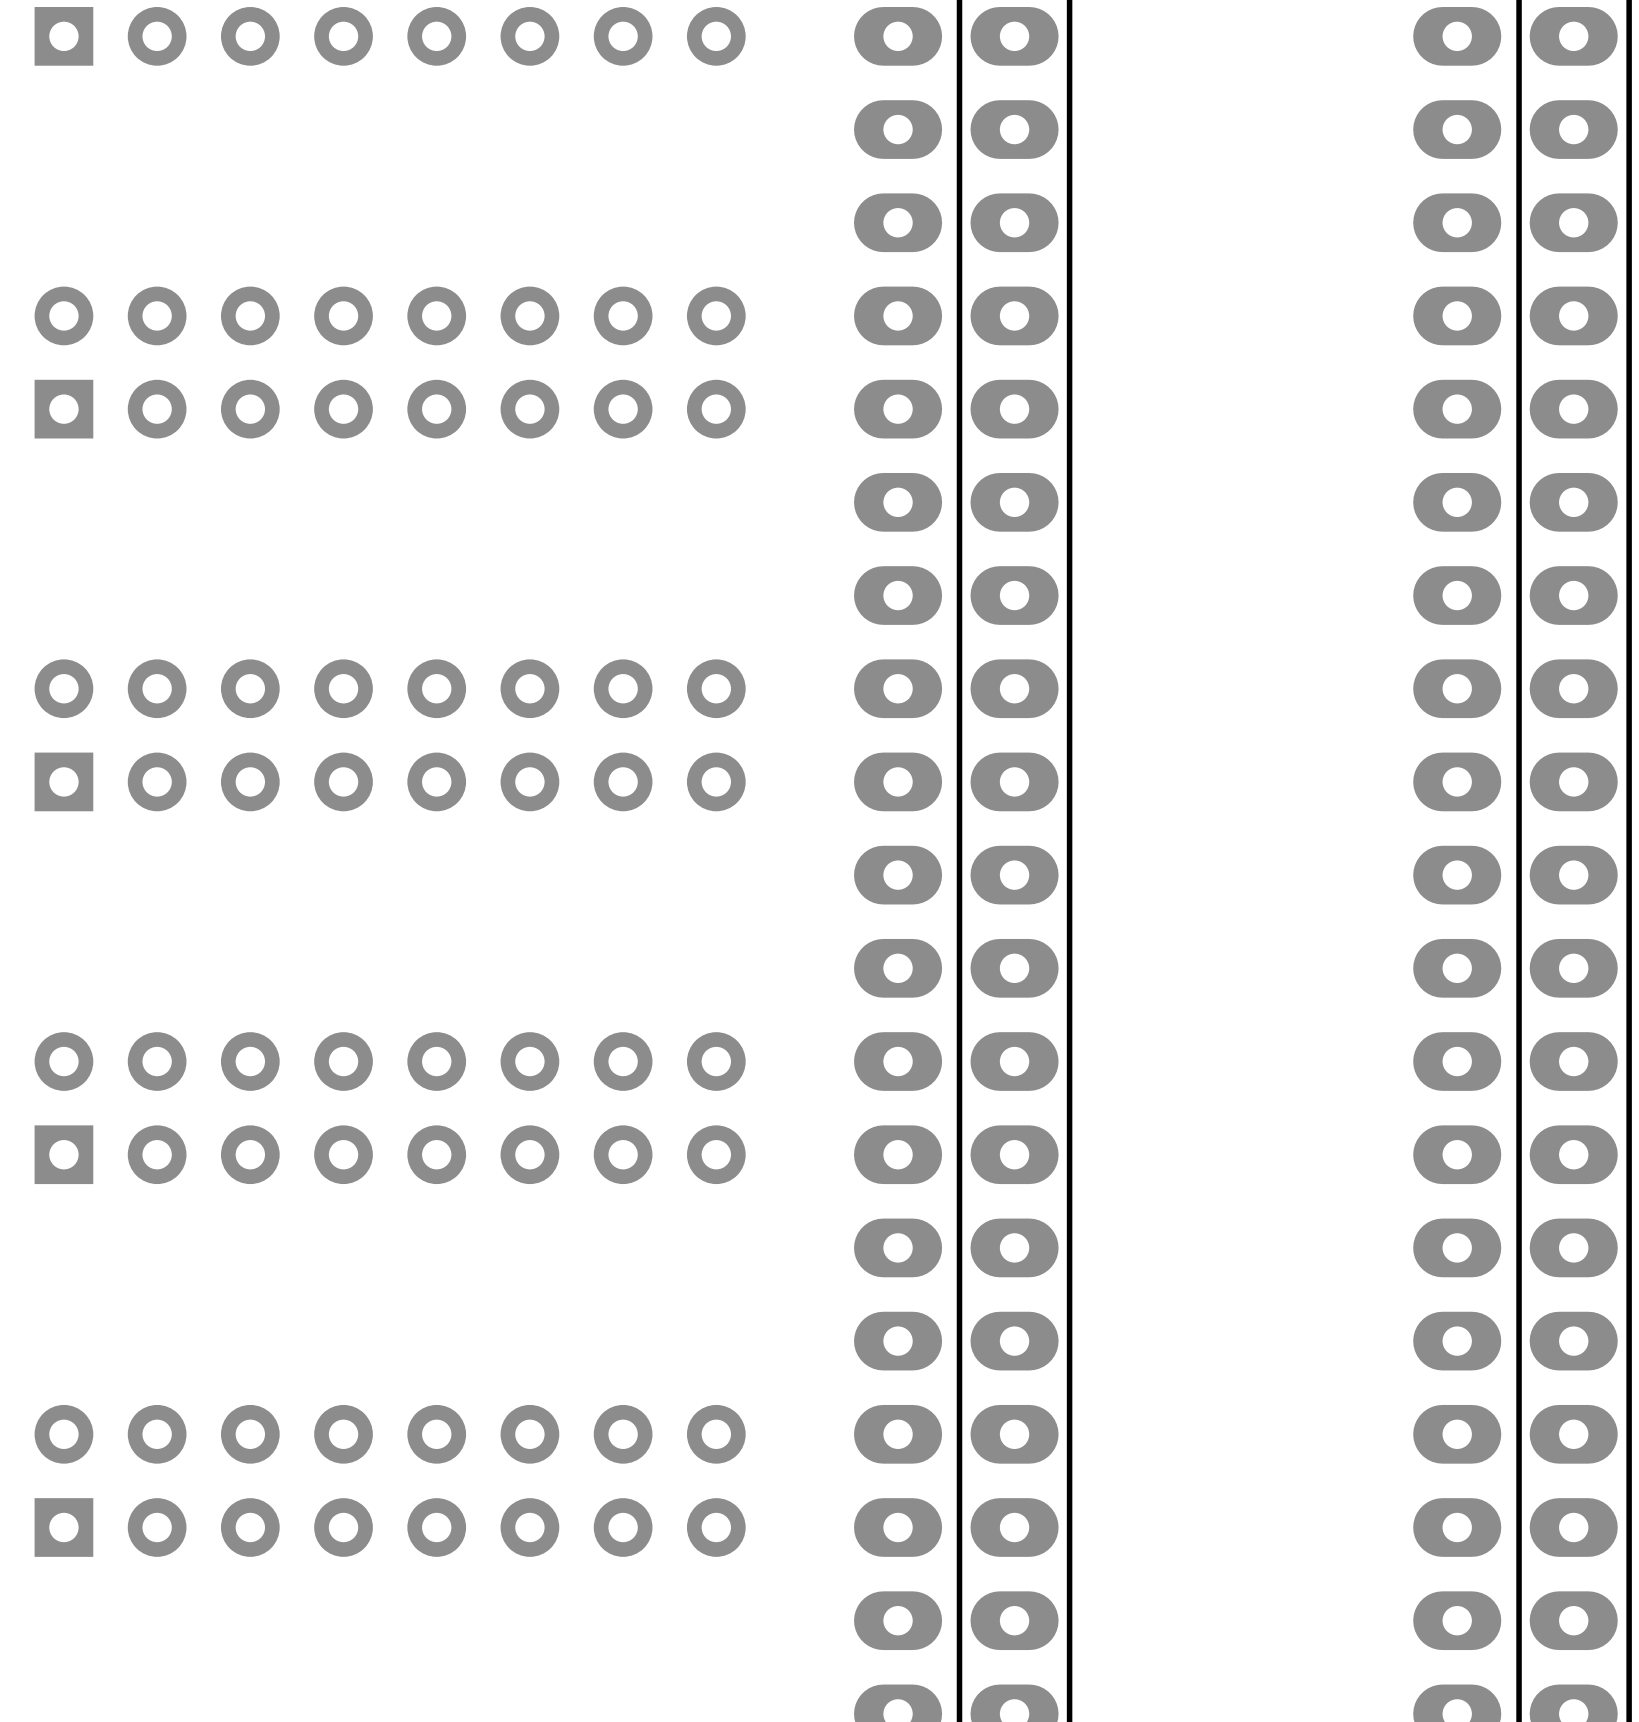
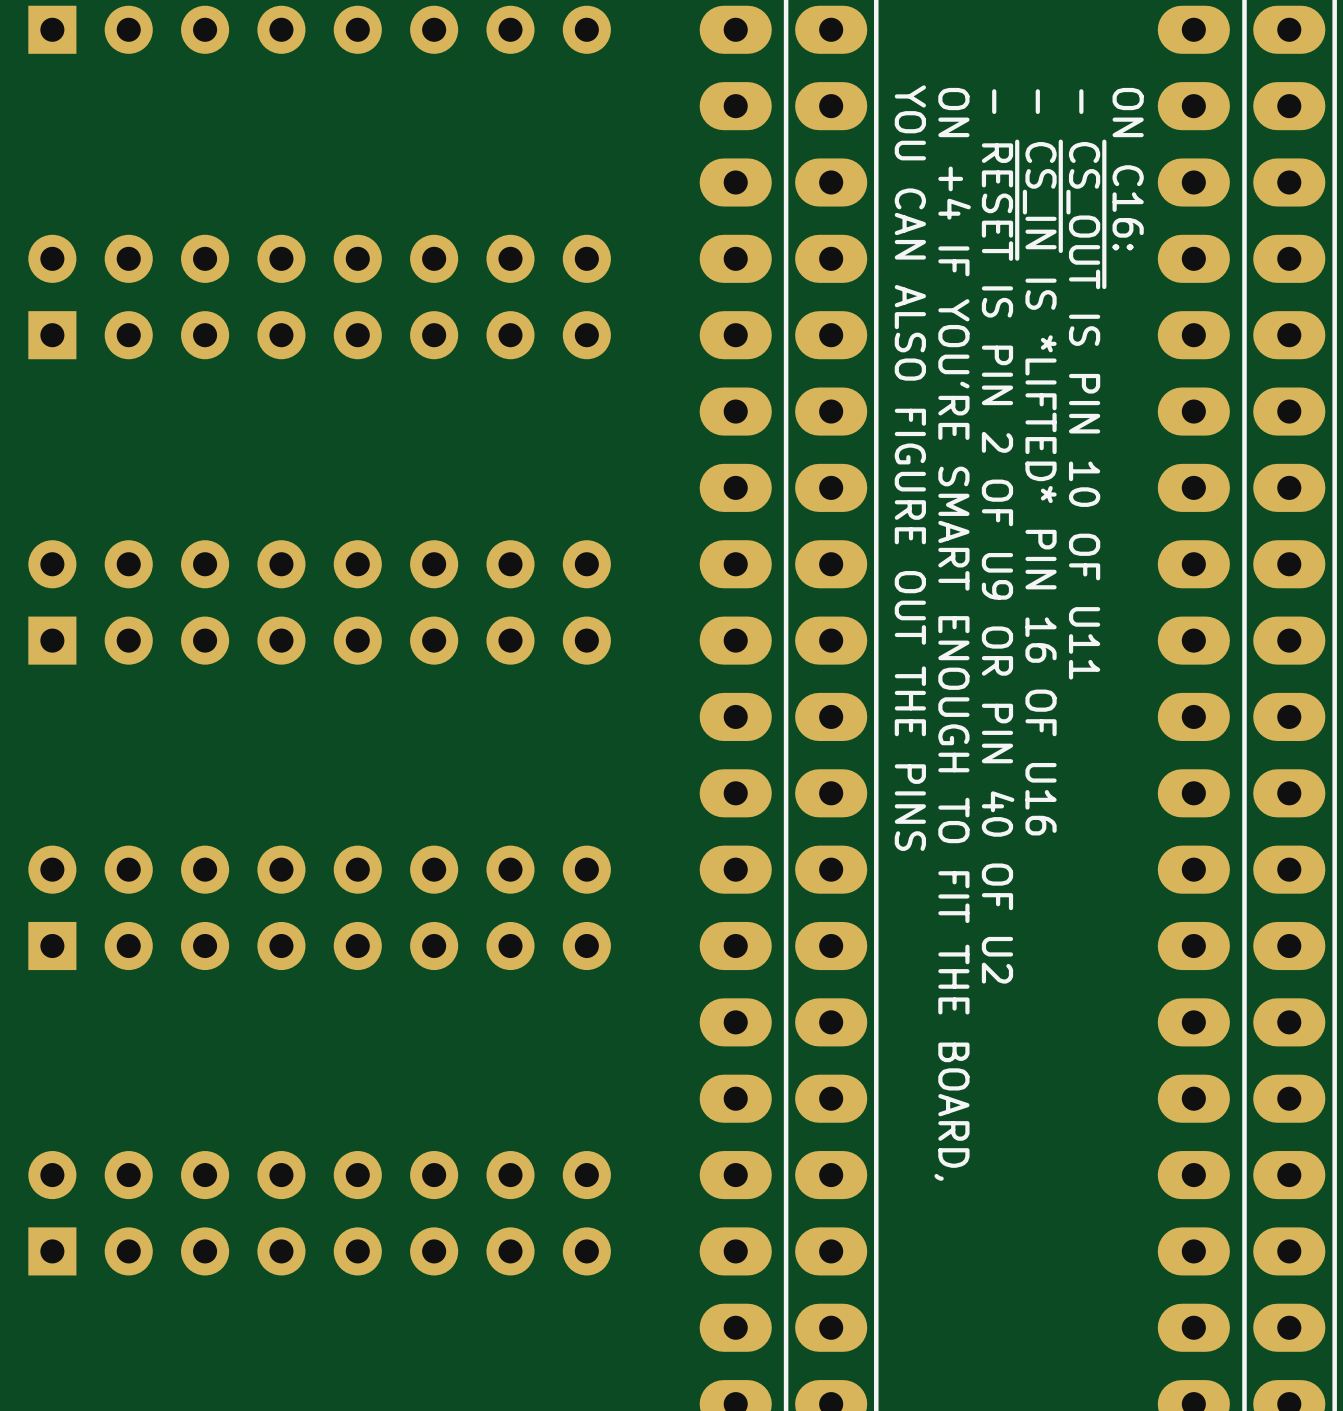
text: none -> ON C16: (1128, 169)
text: none -> - ~{CS_OUT} IS PIN 10 OF U11 (1086, 384)
text: none -> - ~{CS_IN} IS *LIFTED* PIN 16 OF U16 (1042, 462)
text: none -> YOU CAN ALSO FIGURE OUT THE PINS (910, 468)
text: none -> - ~{RESET} IS PIN 2 OF U9 OR PIN 40 OF U2 (1000, 536)
text: none -> ON +4 IF YOU'RE SMART ENOUGH TO FIT THE BOARD, (952, 634)

